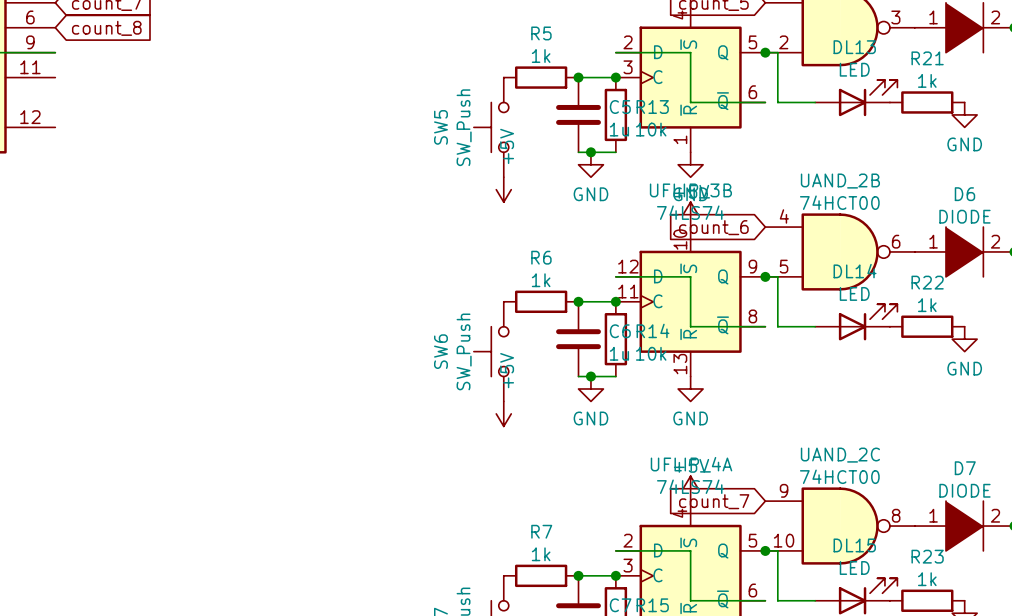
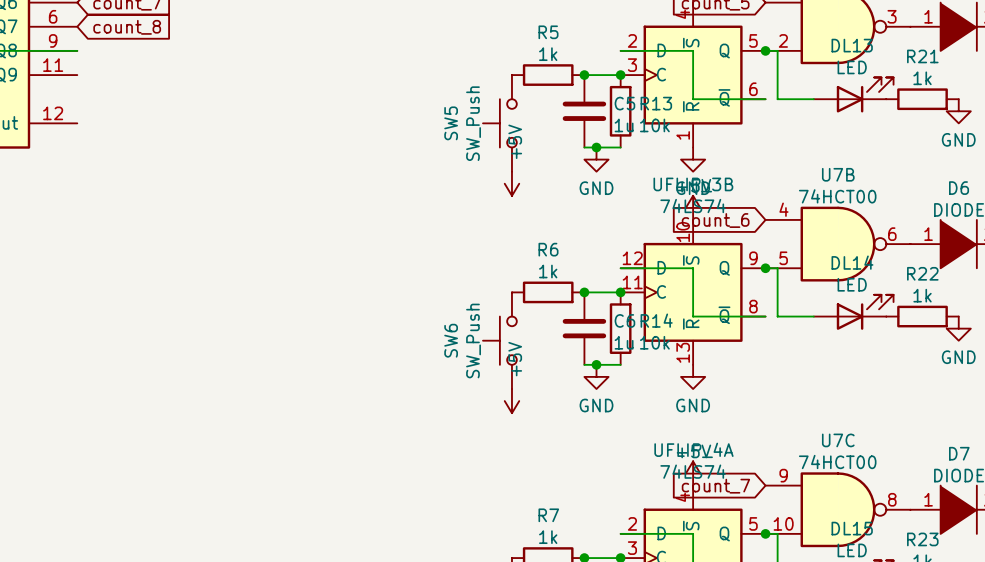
UAND_2B name: UAND_2B (840, 181) -> U7B (838, 174)
UAND_2C name: UAND_2C (840, 455) -> U7C (838, 440)

